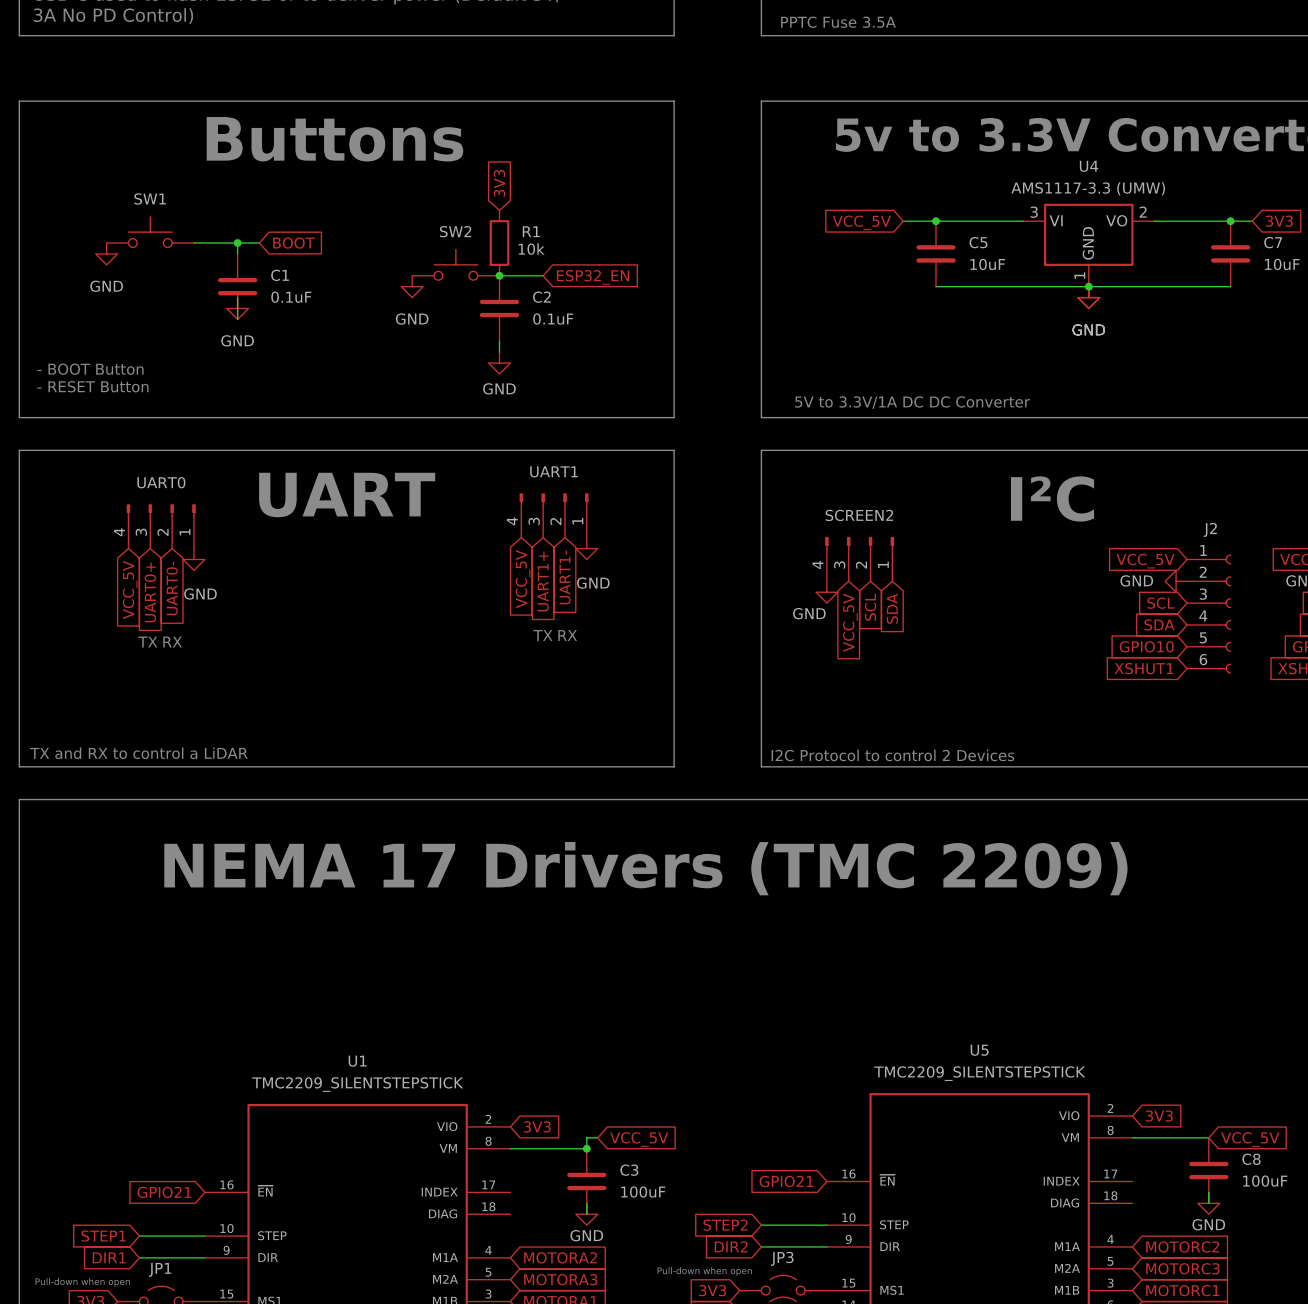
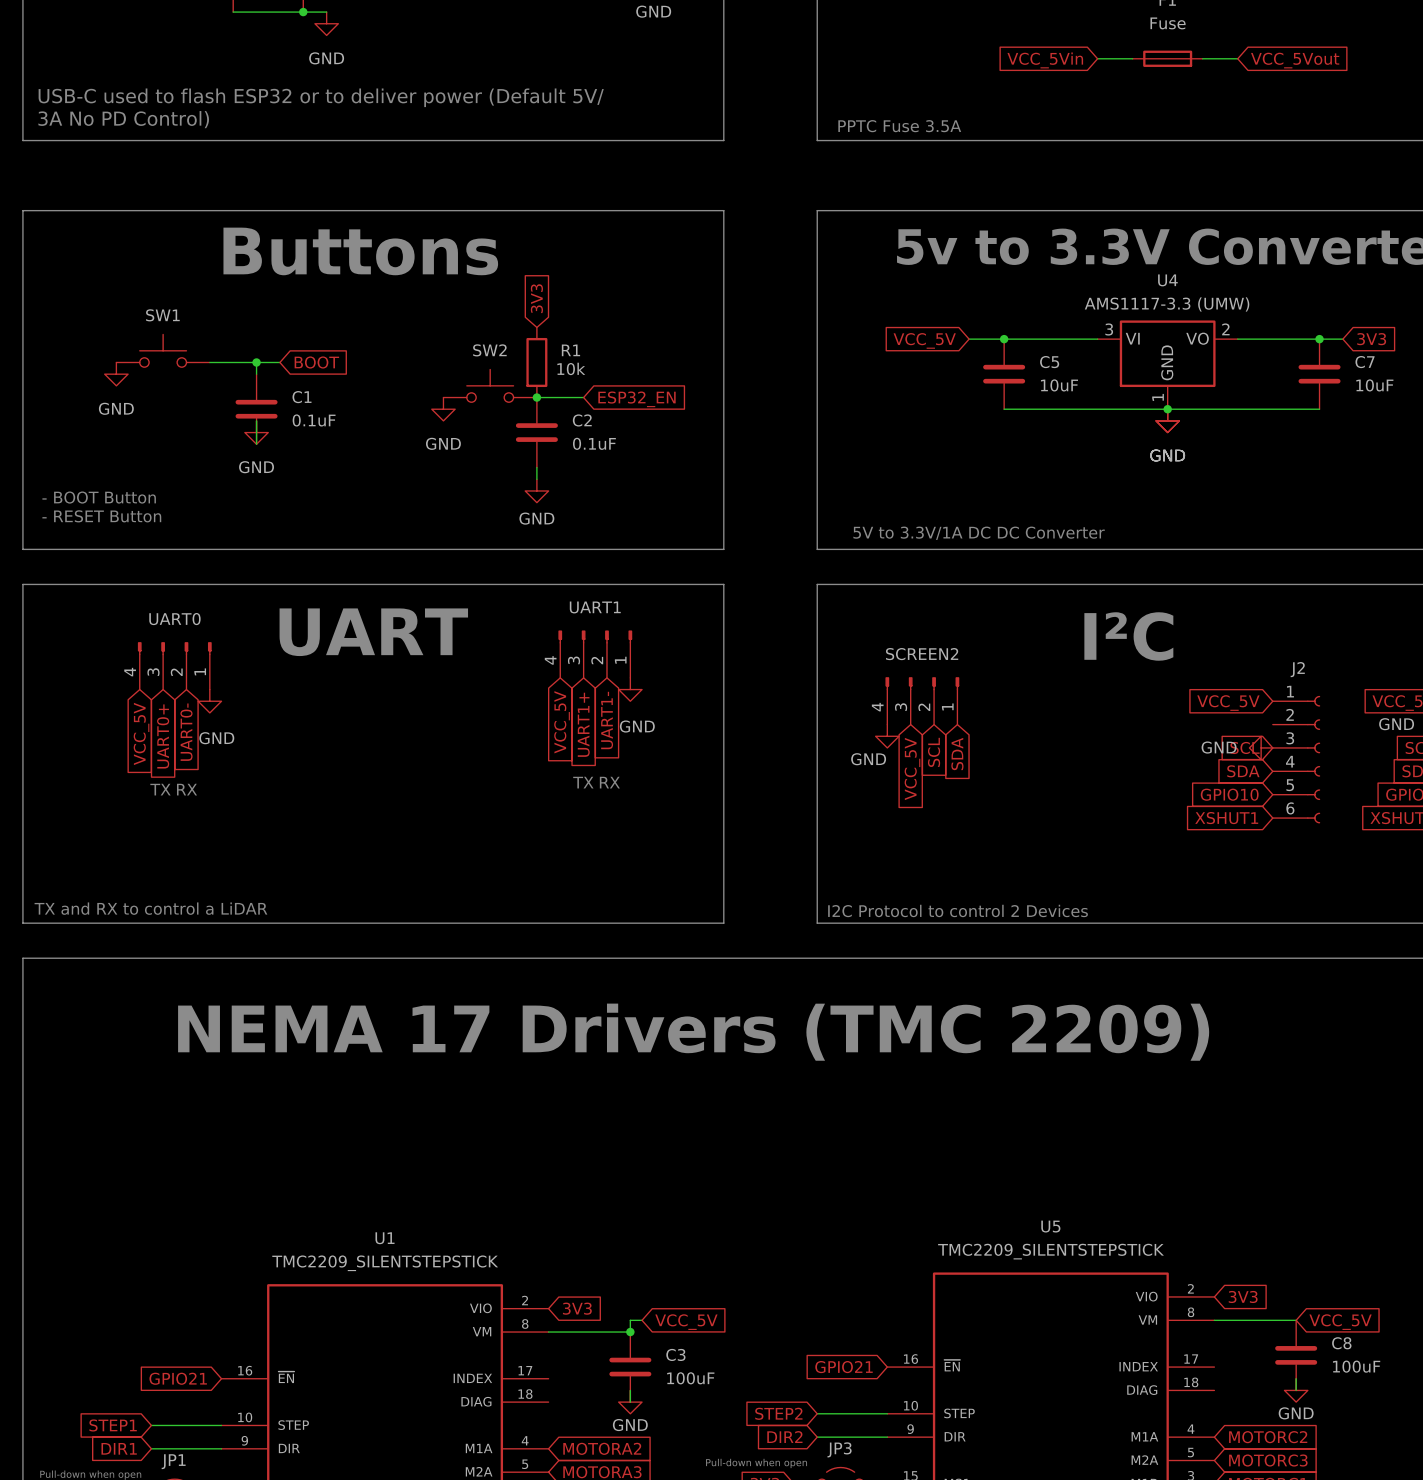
power symbol position: GND (1176, 581) -> GND (1261, 747)

